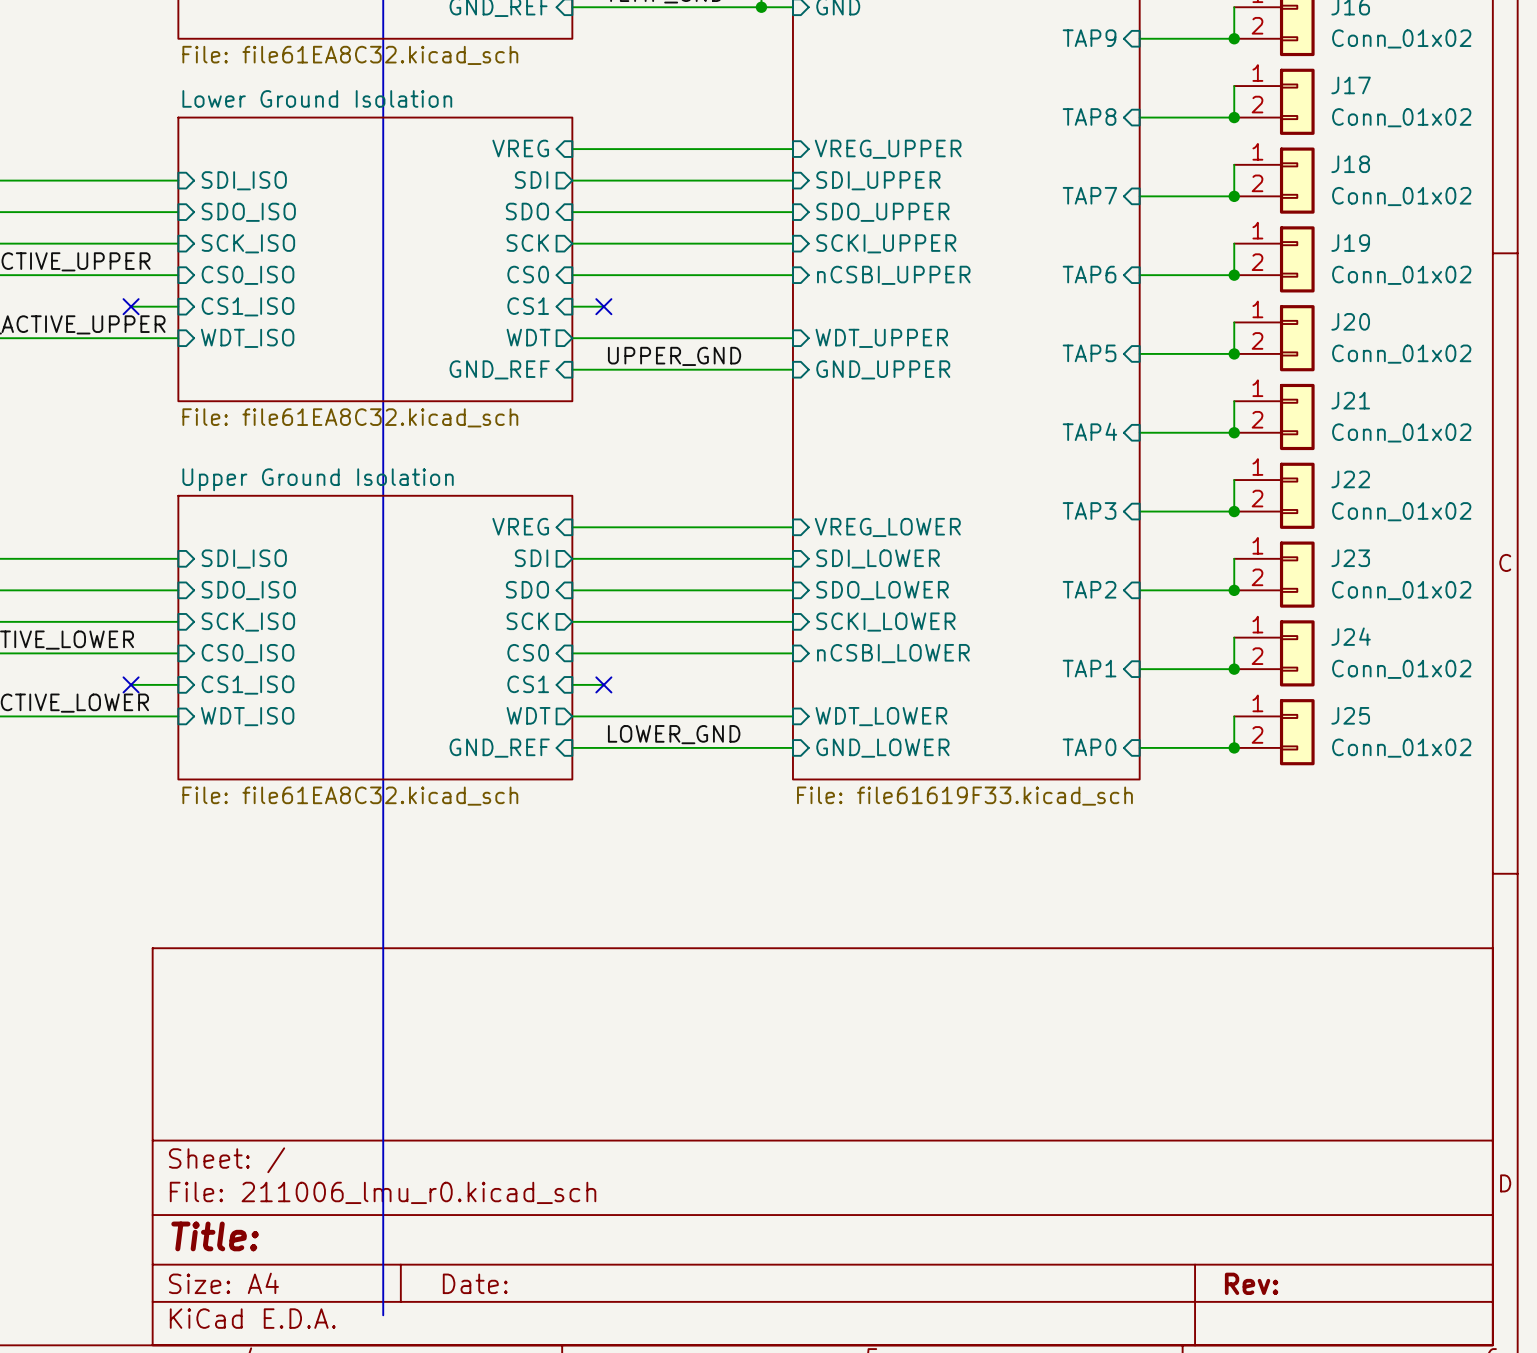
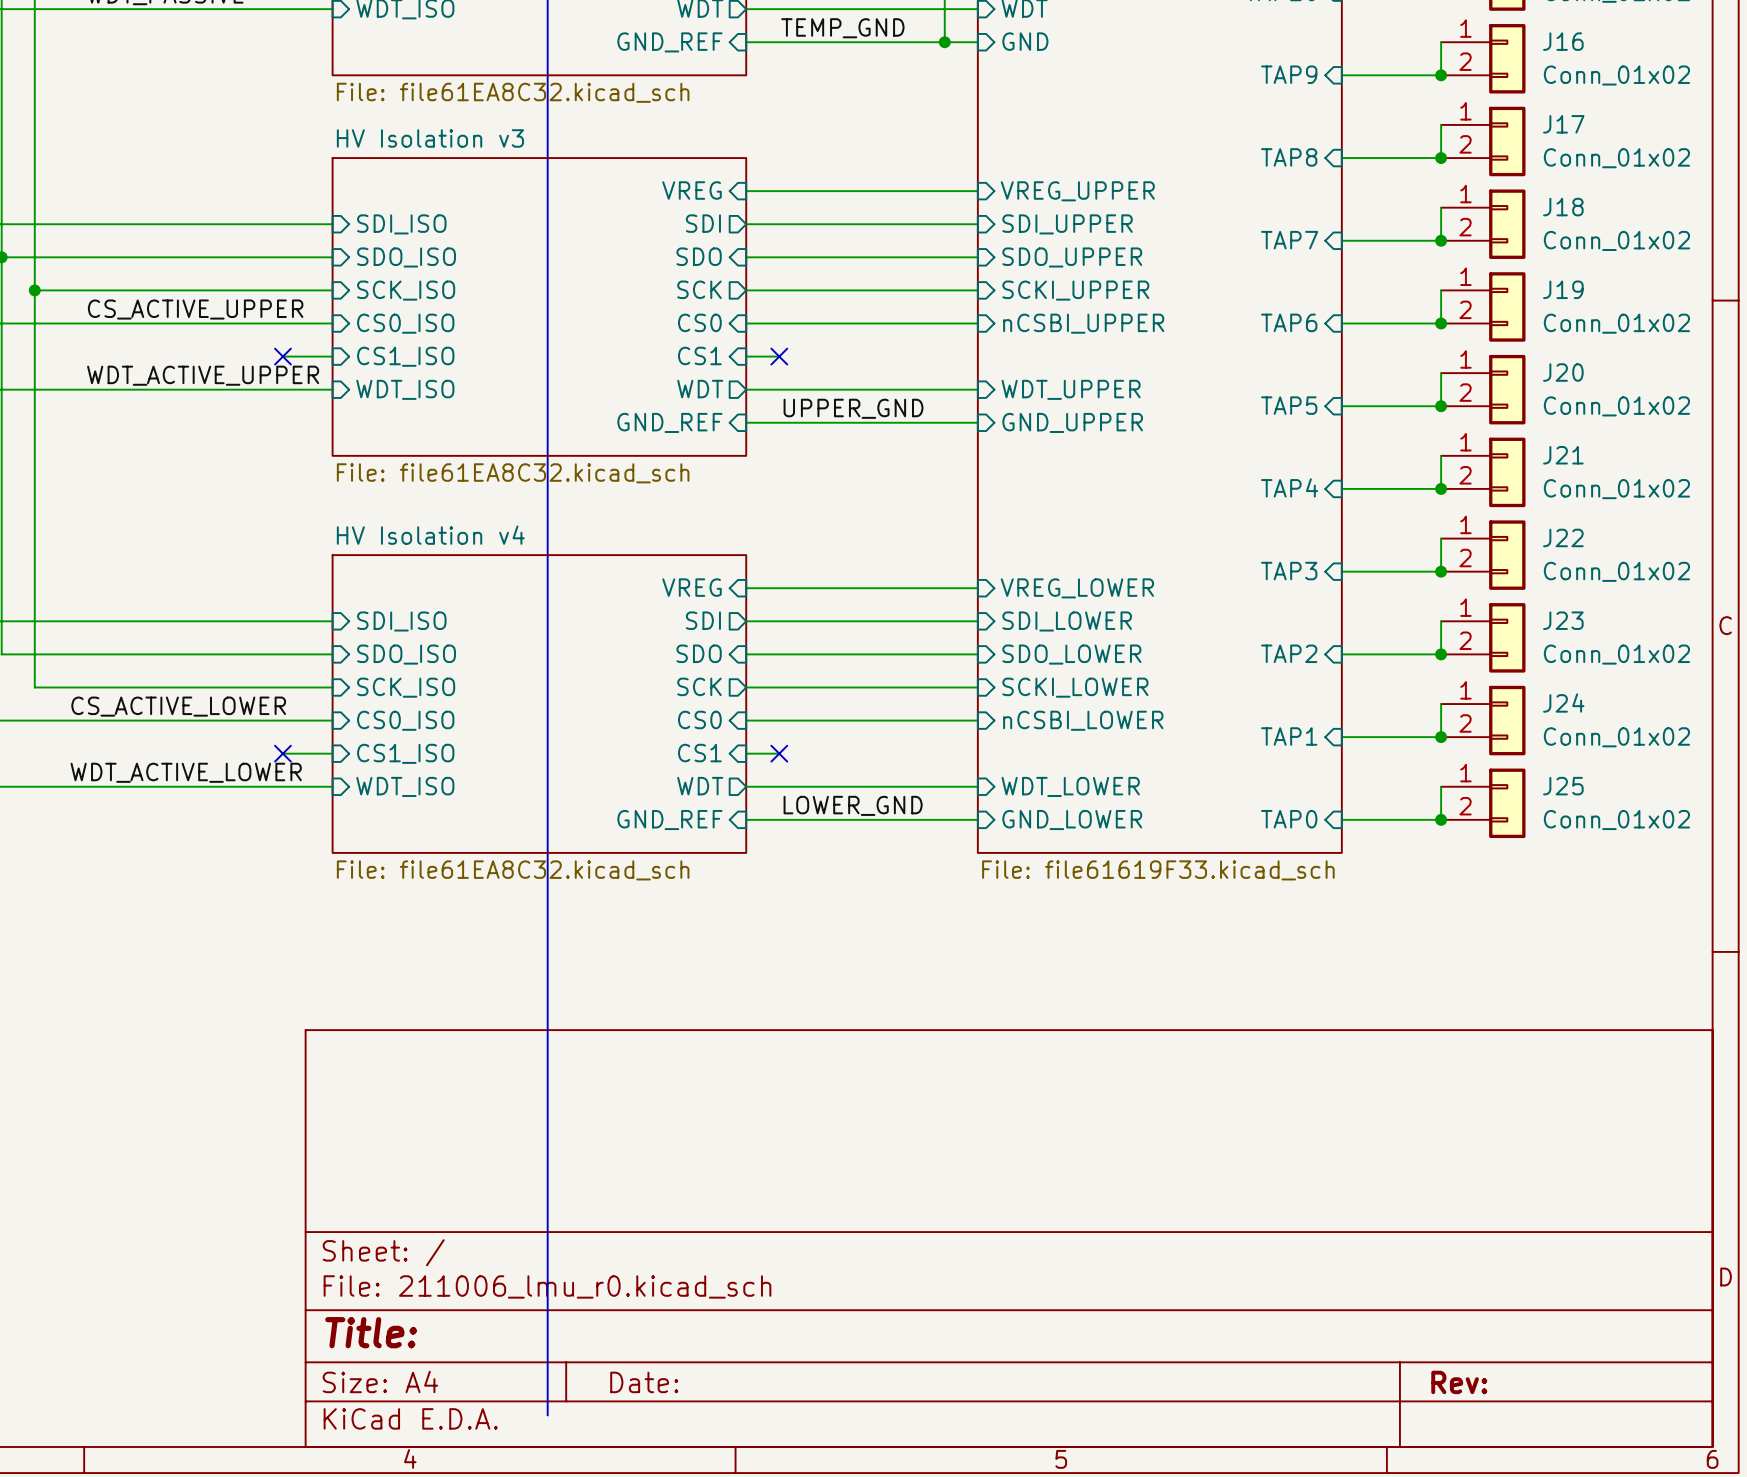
sheet Lower Ground Isolation name: Lower Ground Isolation (317, 98) -> HV Isolation v3 (430, 138)
sheet Upper Ground Isolation name: Upper Ground Isolation (318, 479) -> HV Isolation v4 (430, 535)

